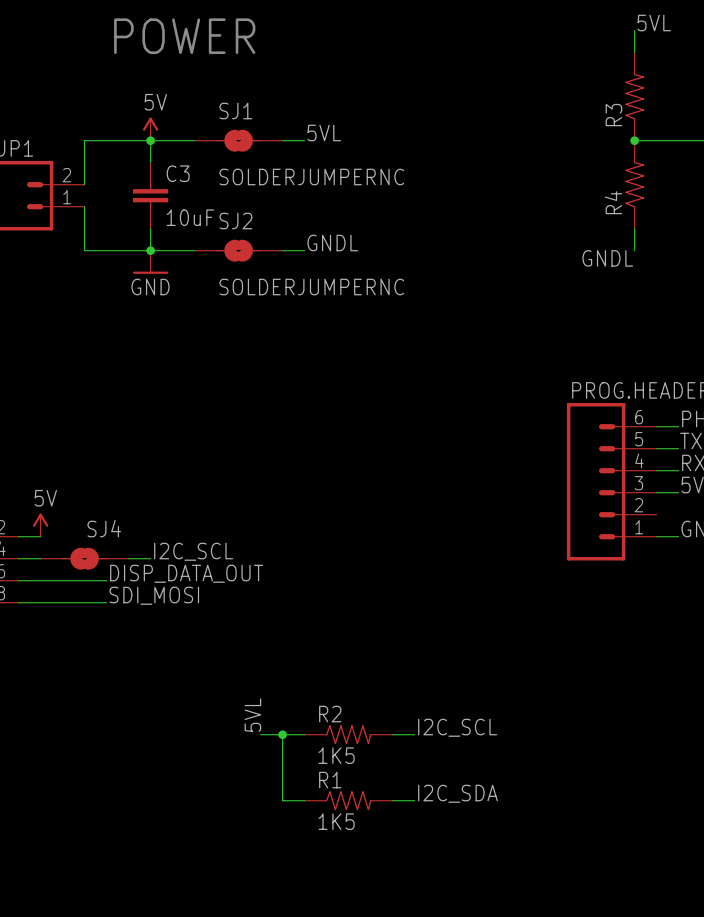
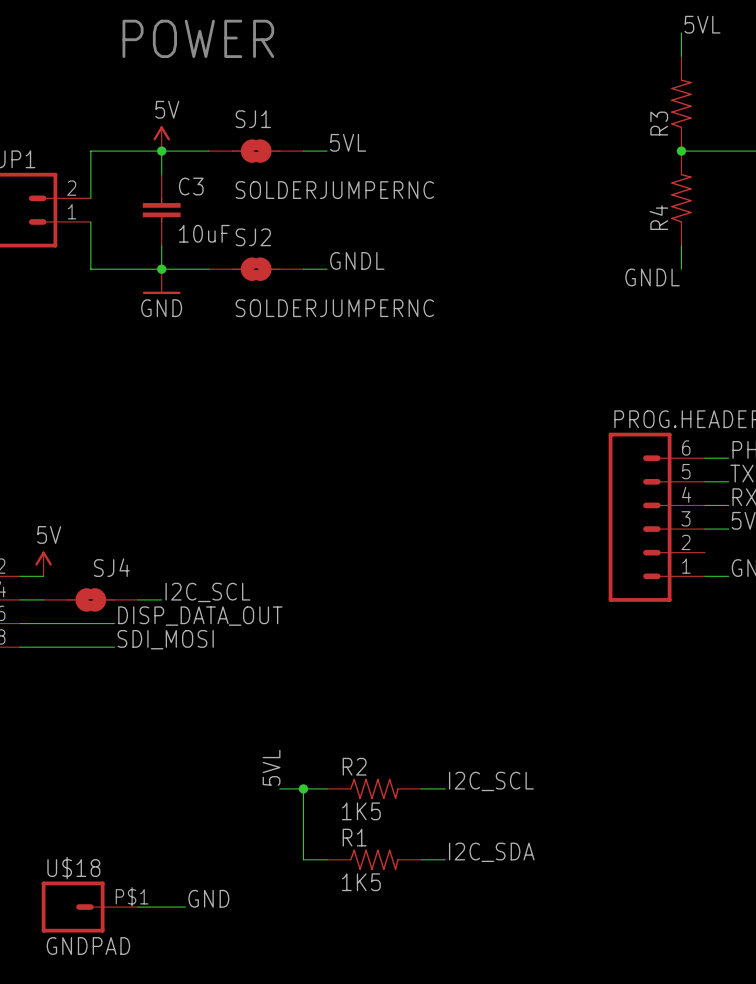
label: none -> GND (208, 898)
U$18: none -> GNDPAD (89, 907)
wire: none -> (138, 907) (185, 907)

